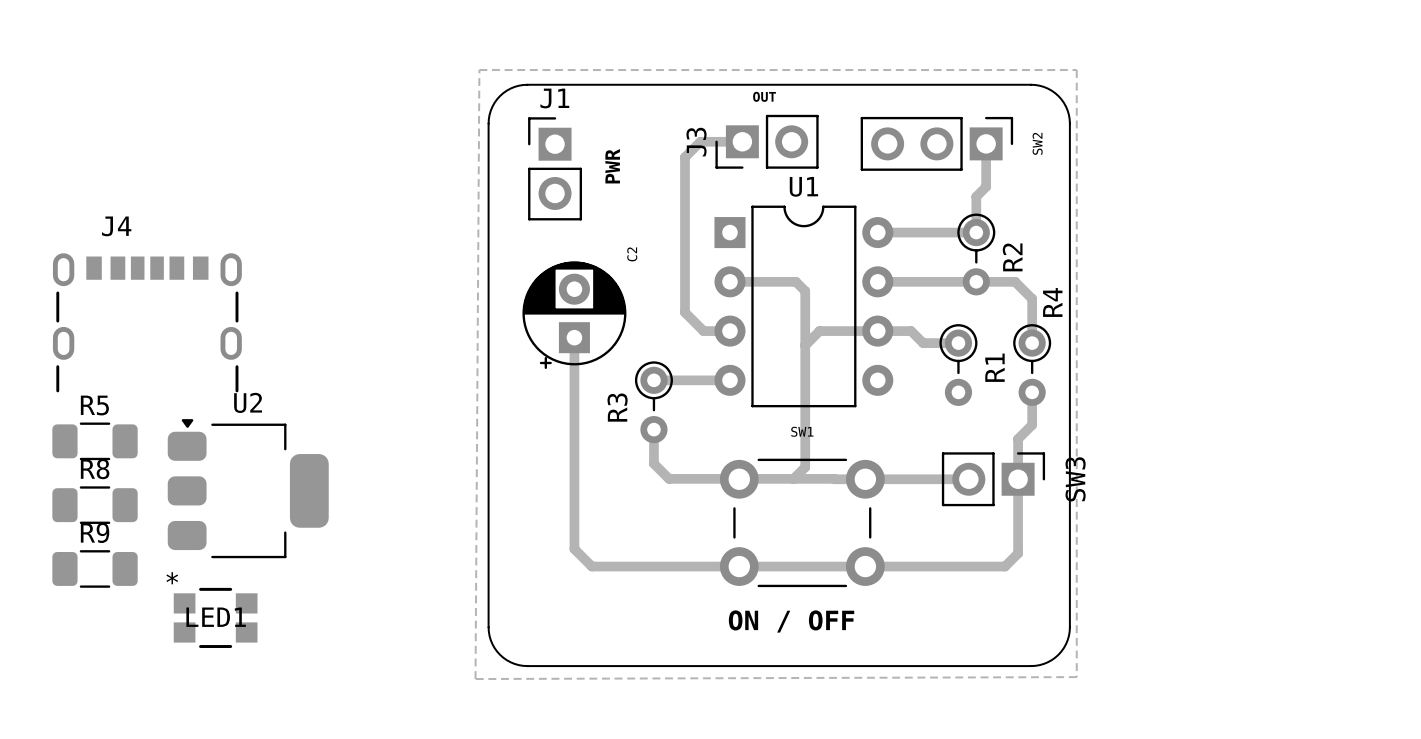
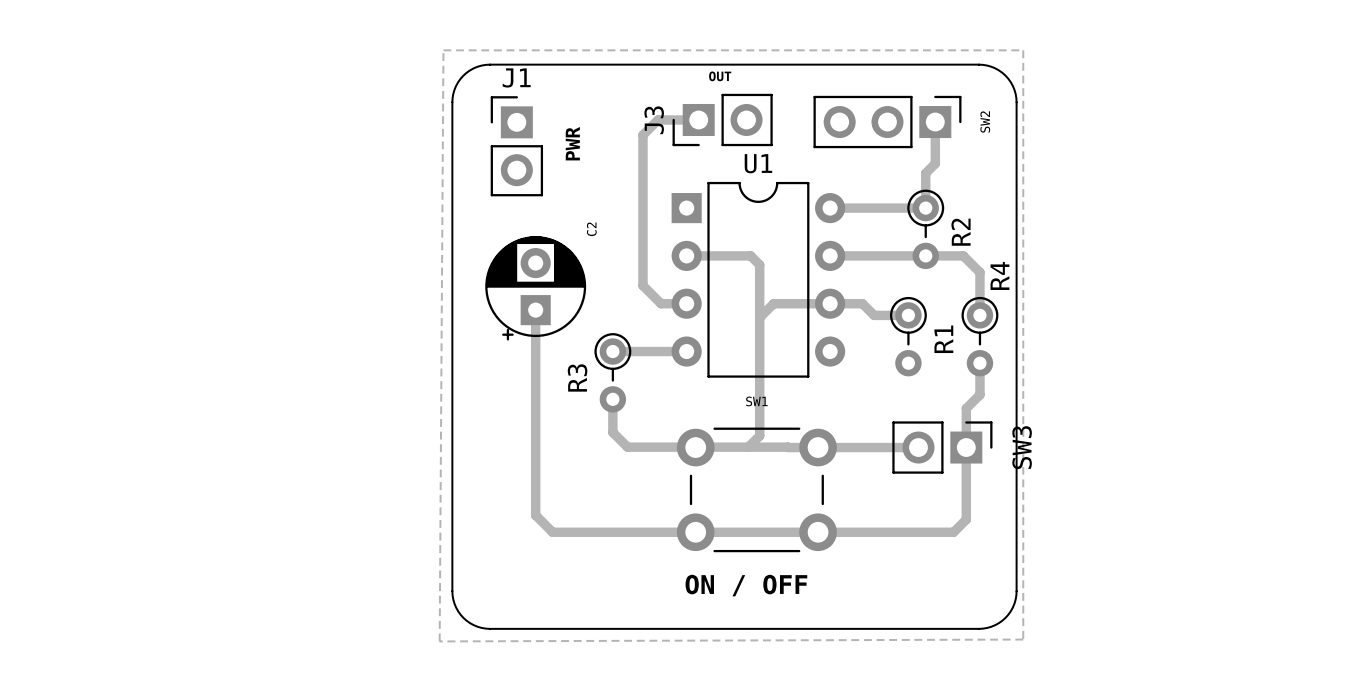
J4: (147, 322) -> none
R5: (95, 441) -> none
U2: (248, 488) -> none
R8: (95, 505) -> none
R9: (95, 568) -> none
LED1: (215, 617) -> none

